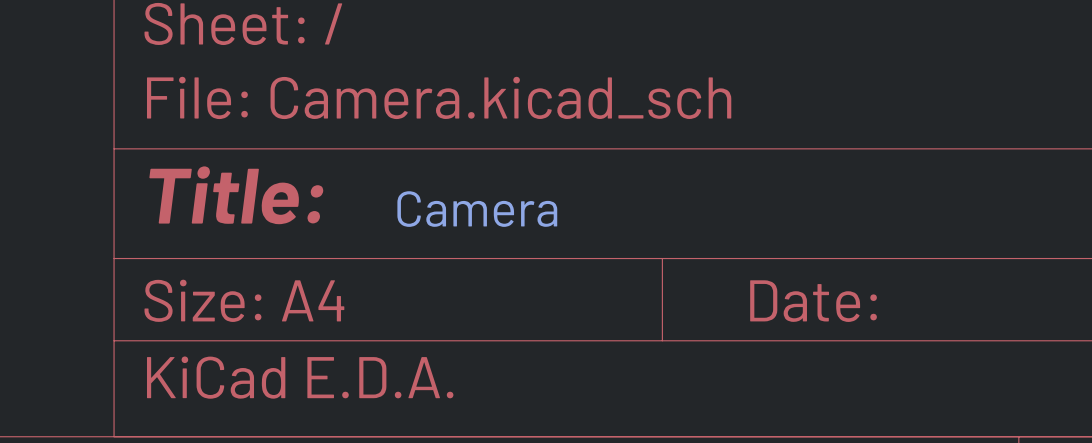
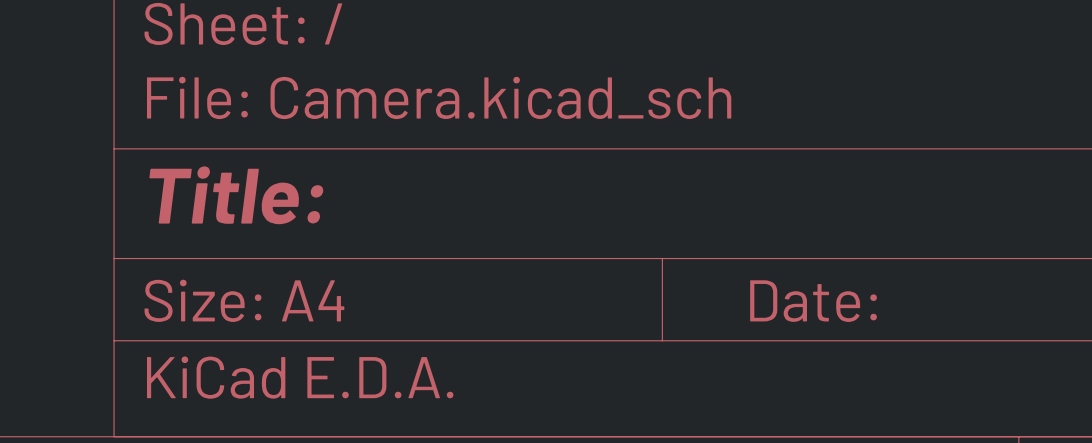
text: Camera (477, 209) -> none

